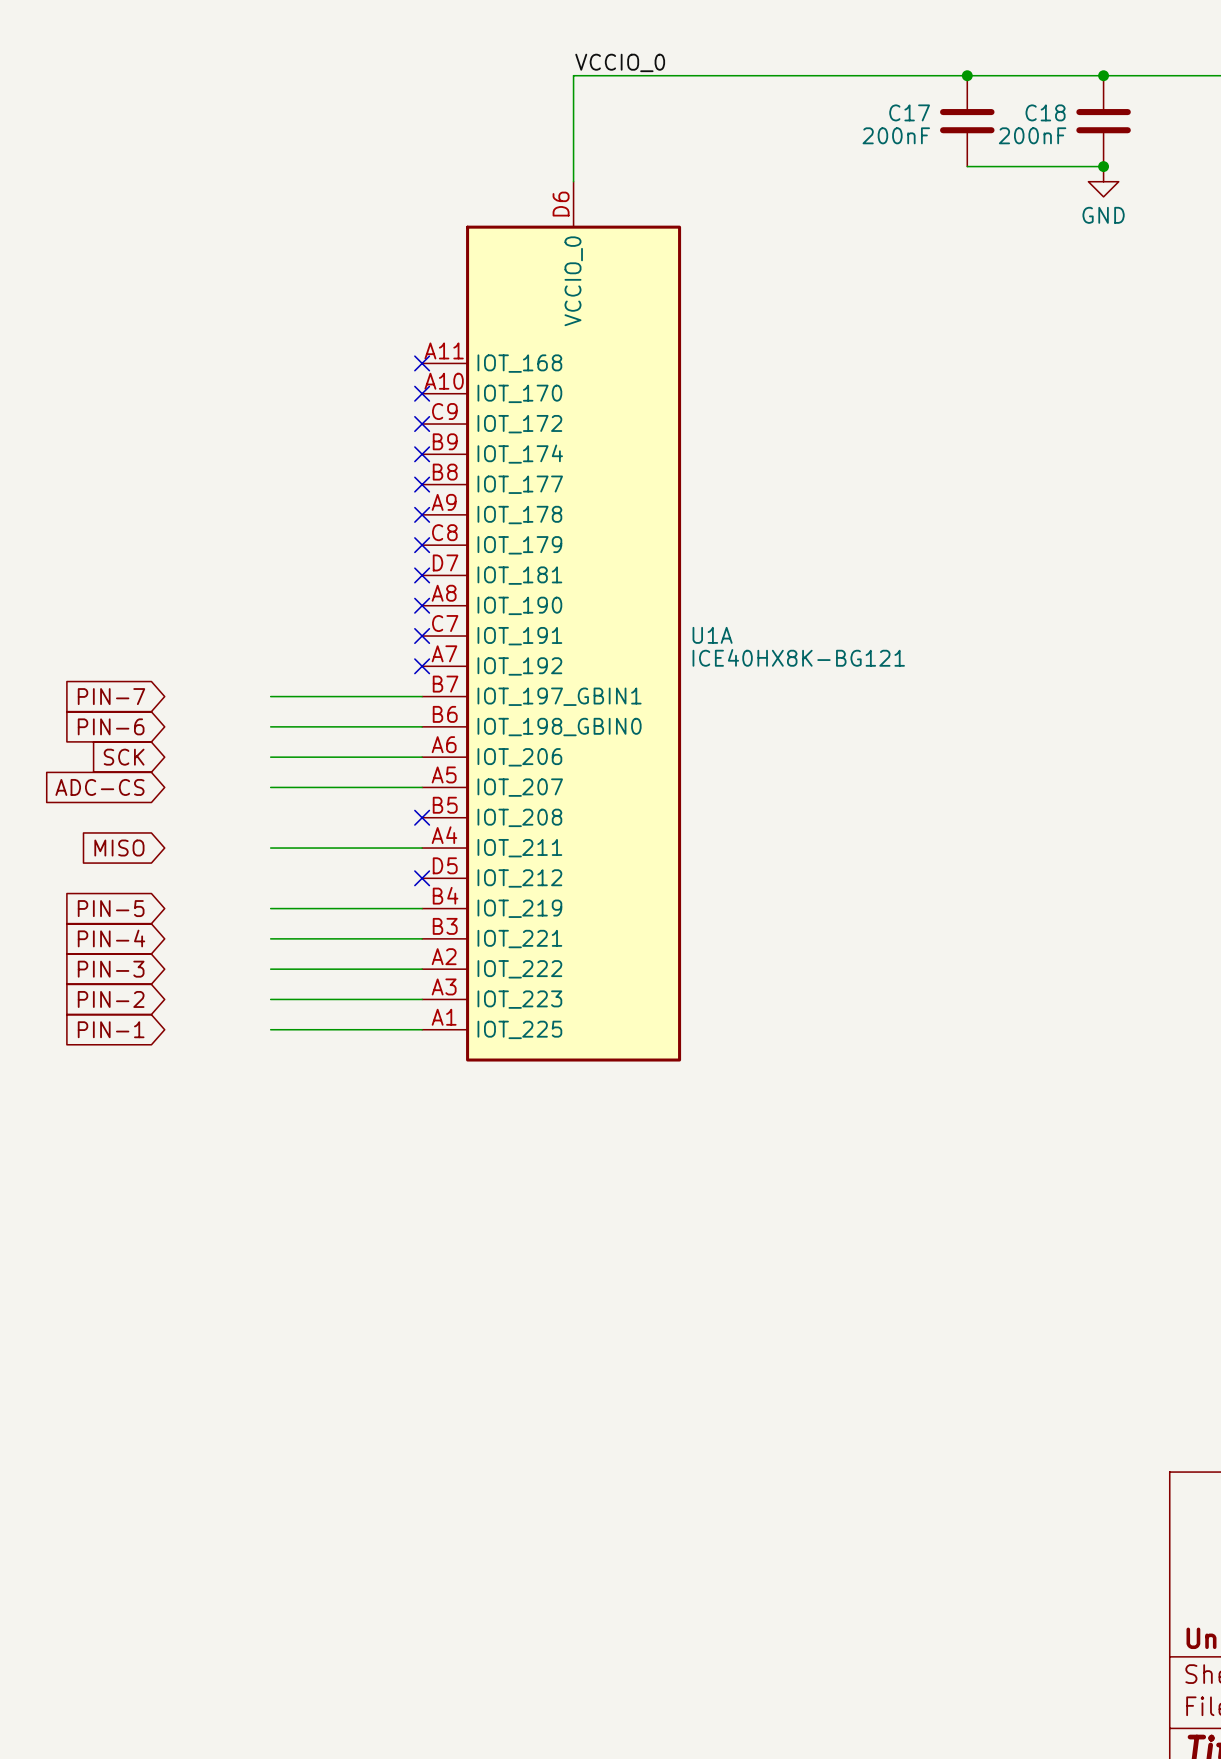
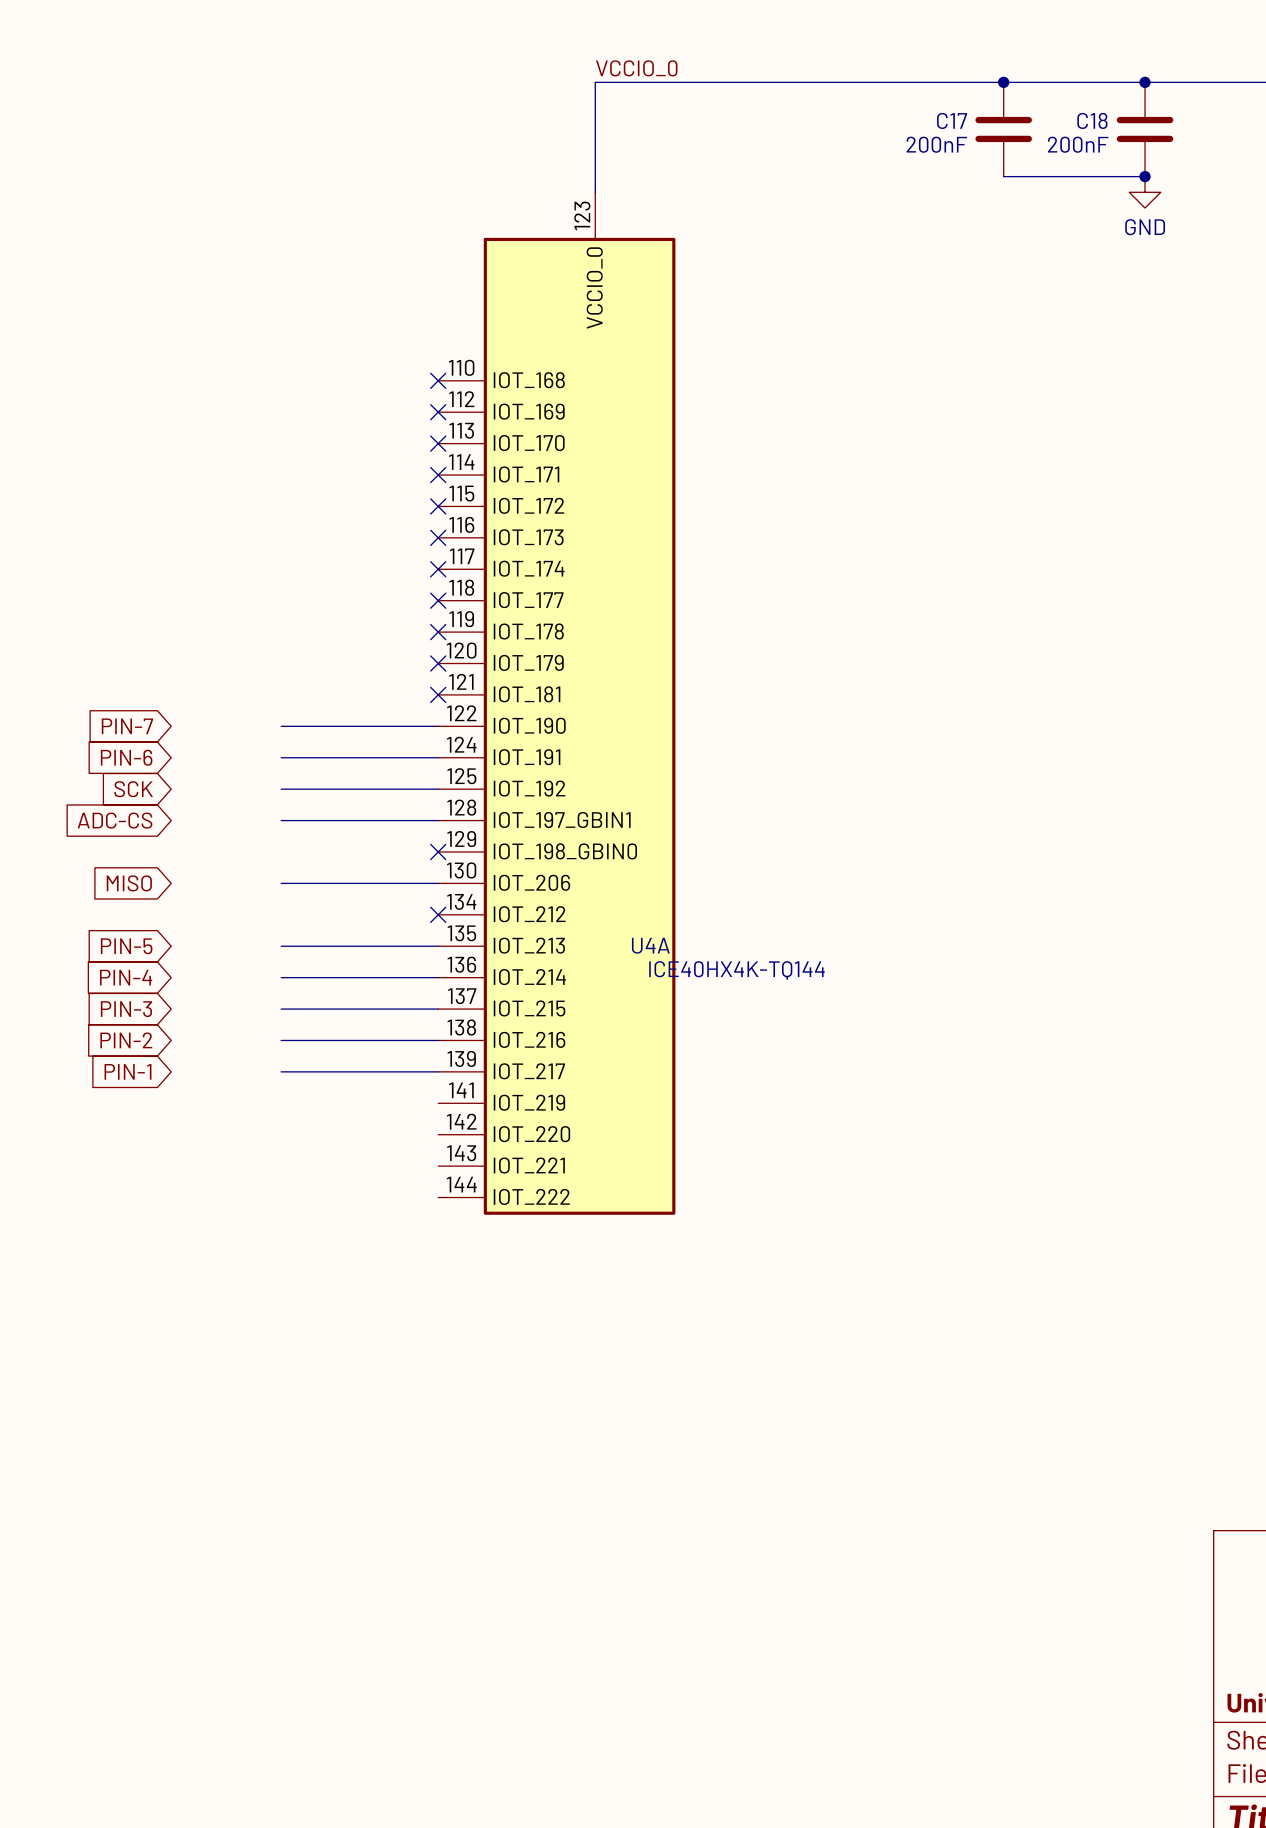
U1A: ICE40HX8K-BG121 (551, 621) -> none
U4A: none -> ICE40HX4K-TQ144 (556, 703)

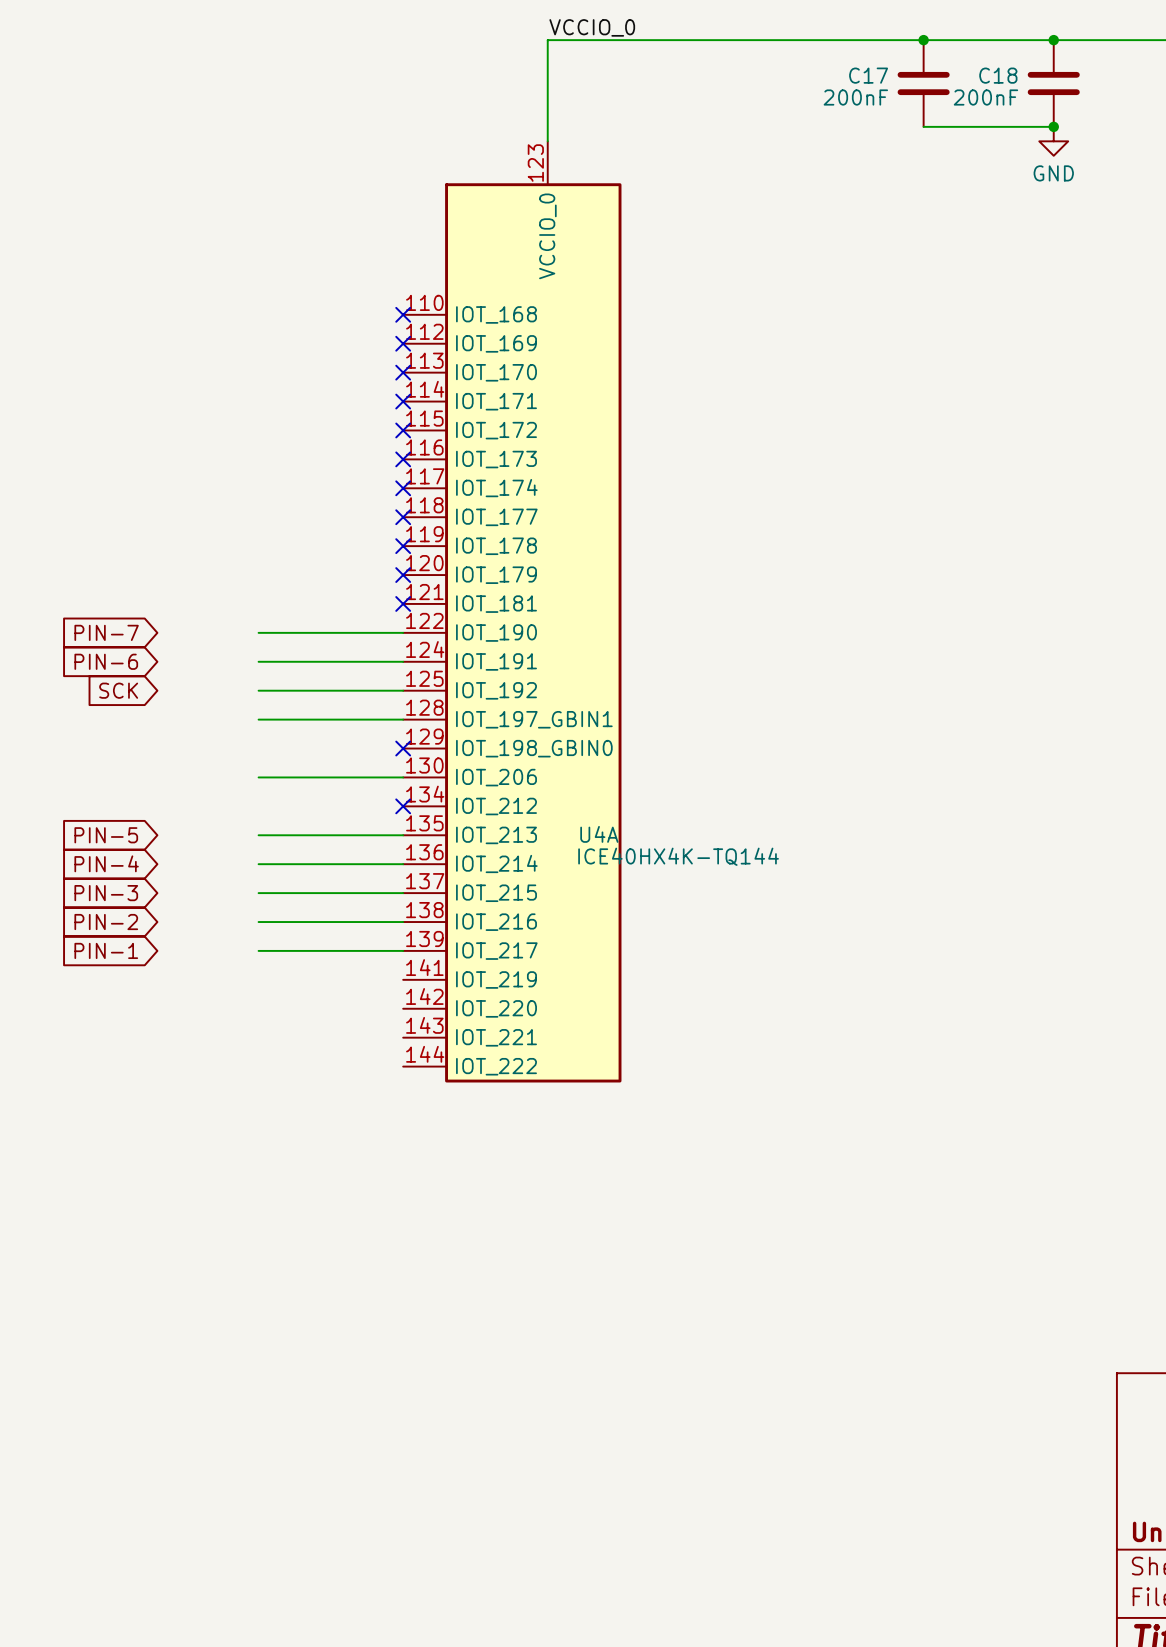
global label: ADC-CS (114, 820) -> none
global label: MISO (129, 883) -> none

